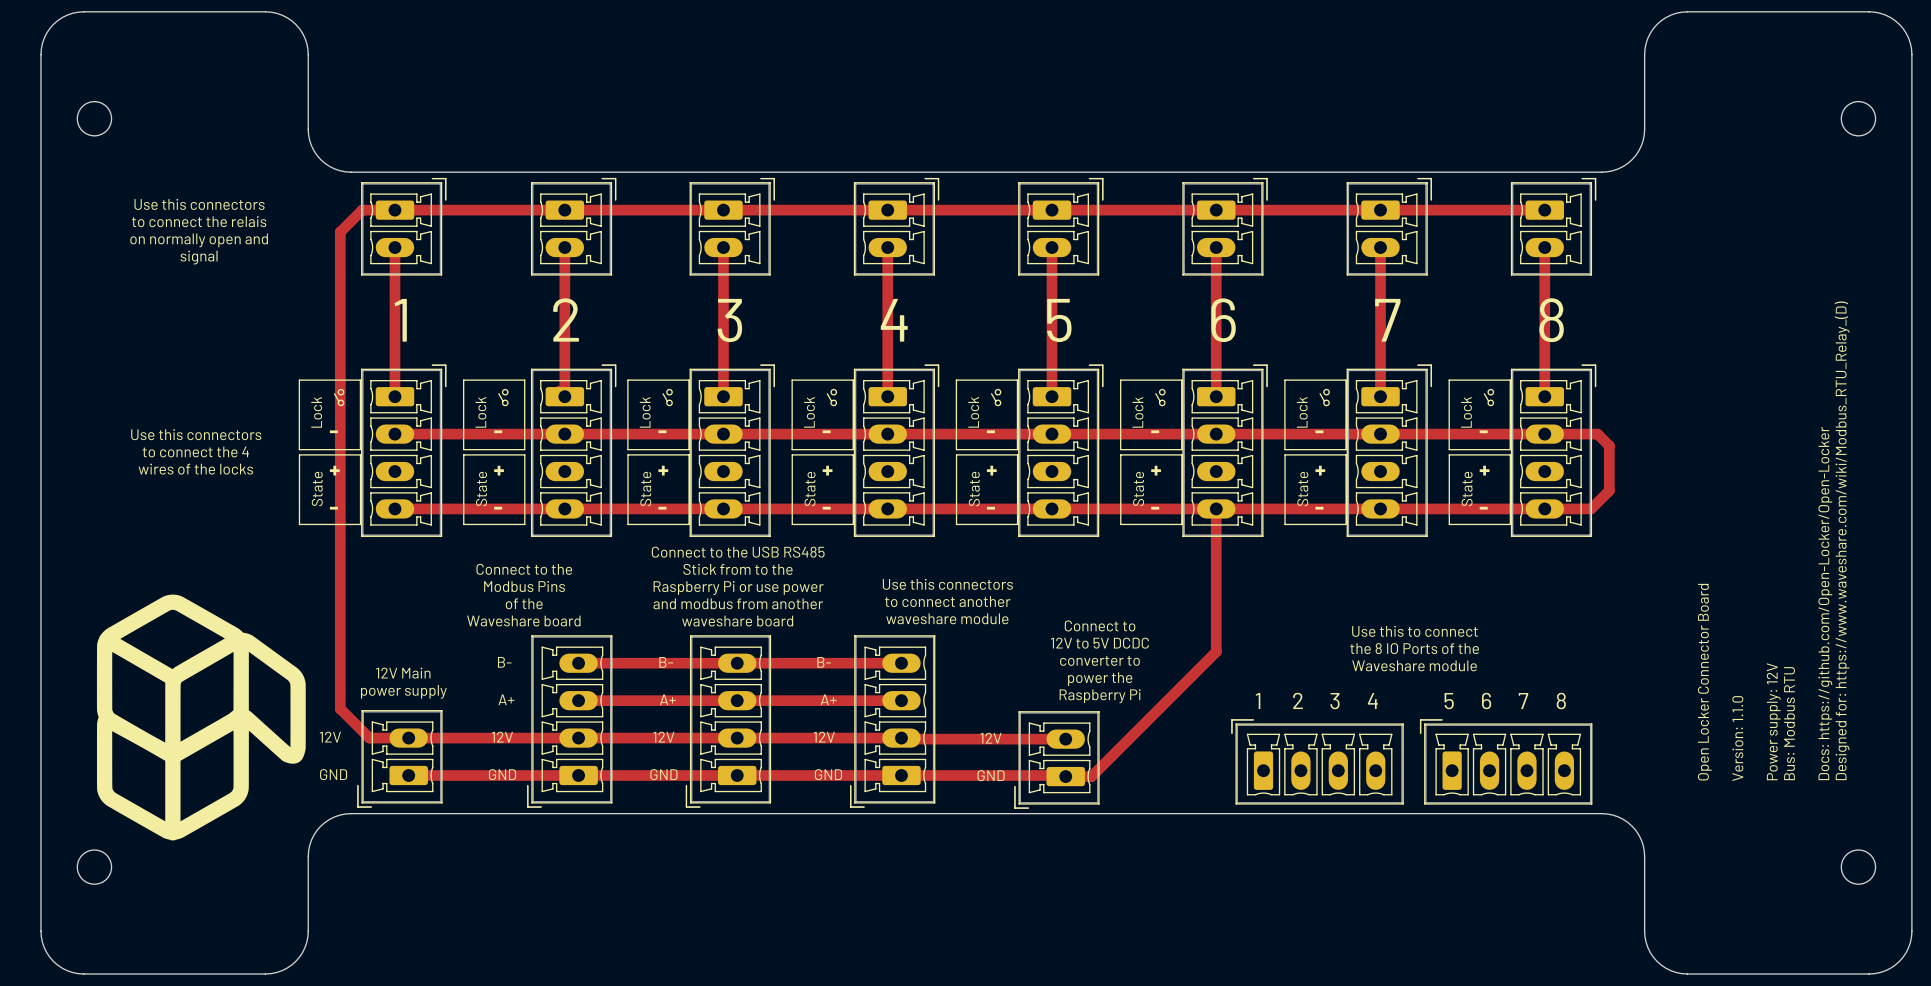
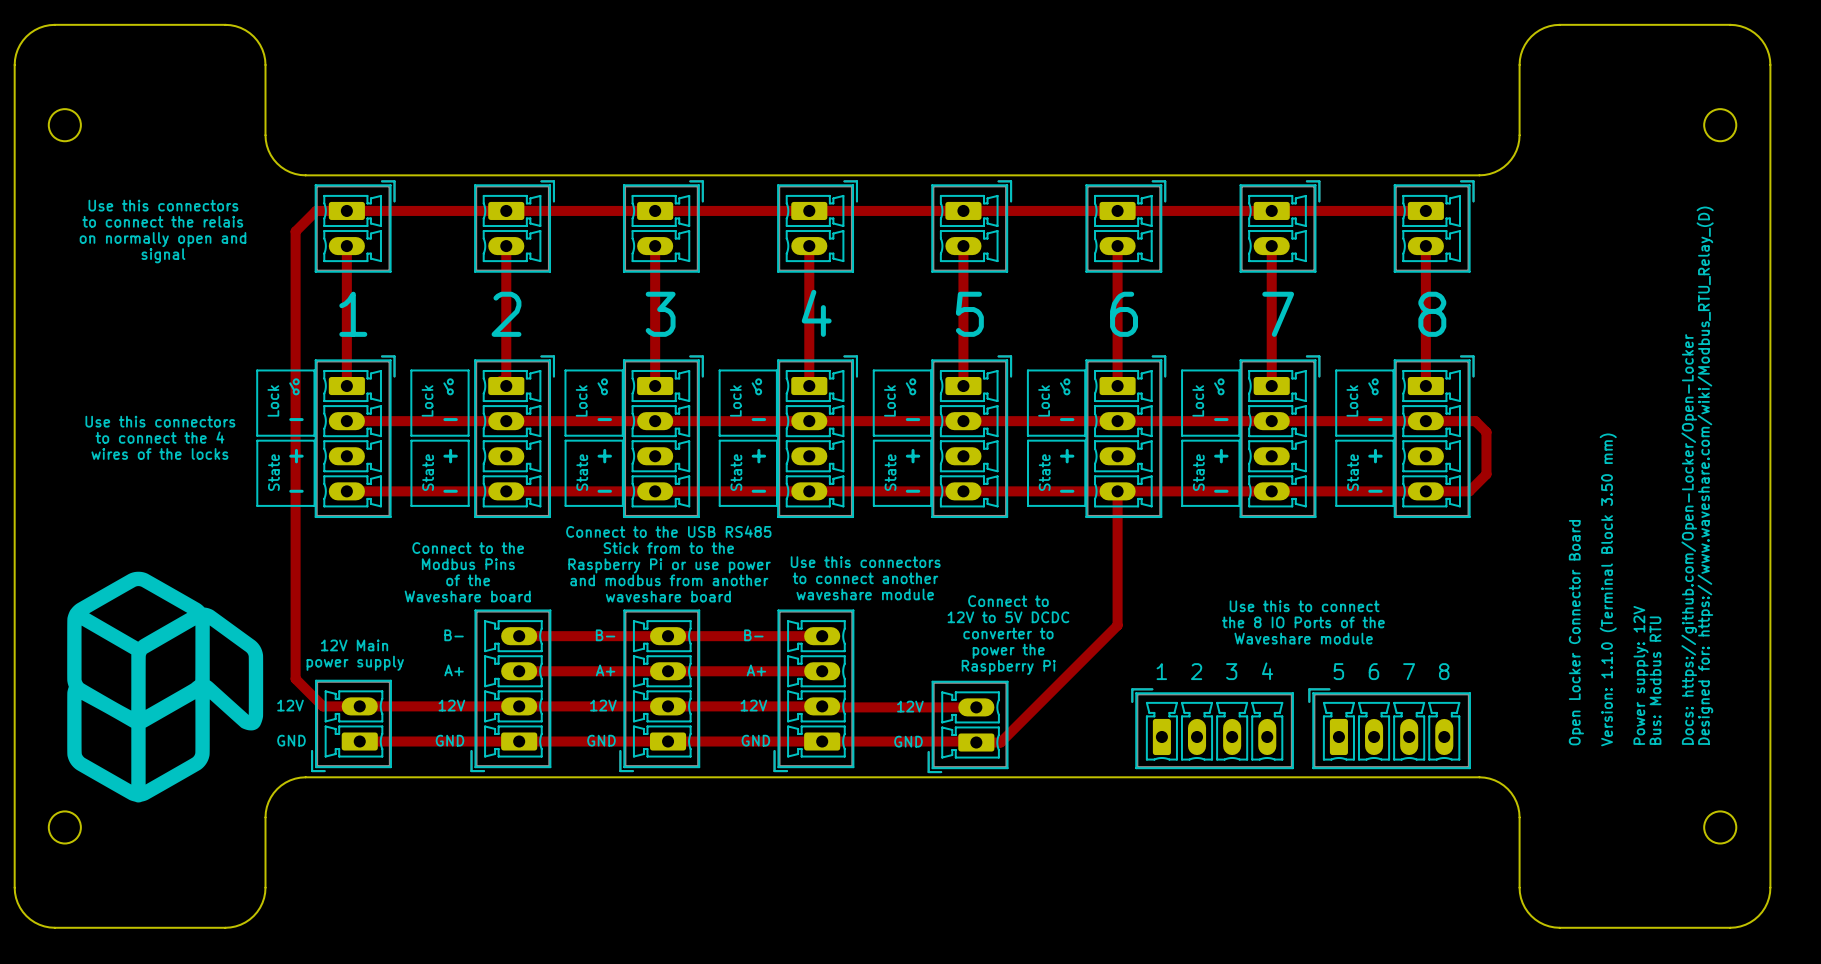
text: Version: 1.1.0 (1737, 738) -> Version: 1.1.0 (Terminal Block 3.50 mm) (1608, 589)

